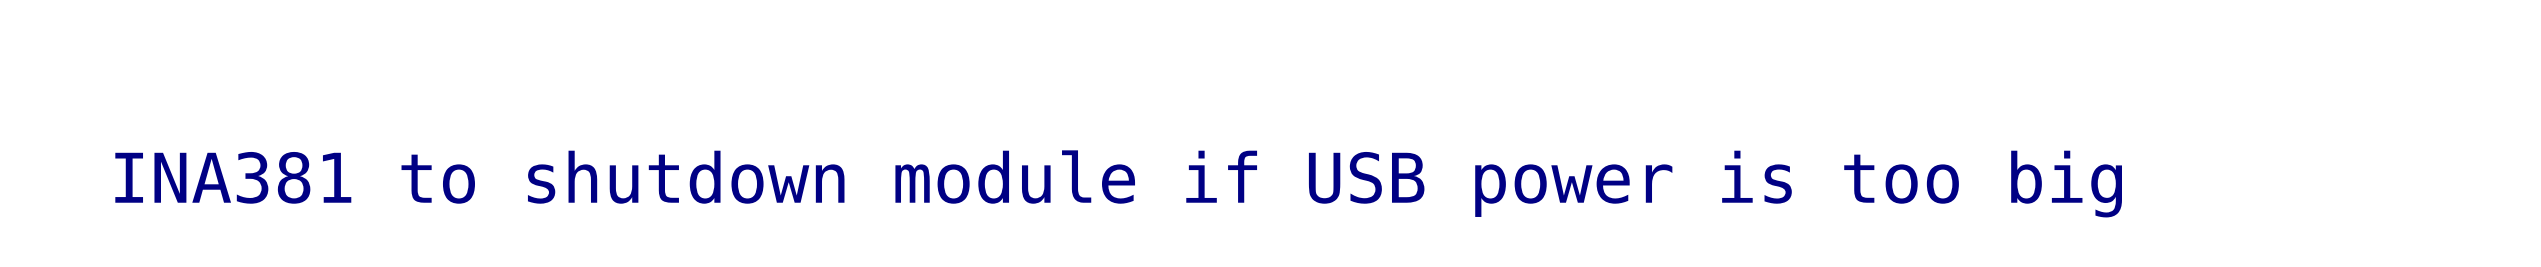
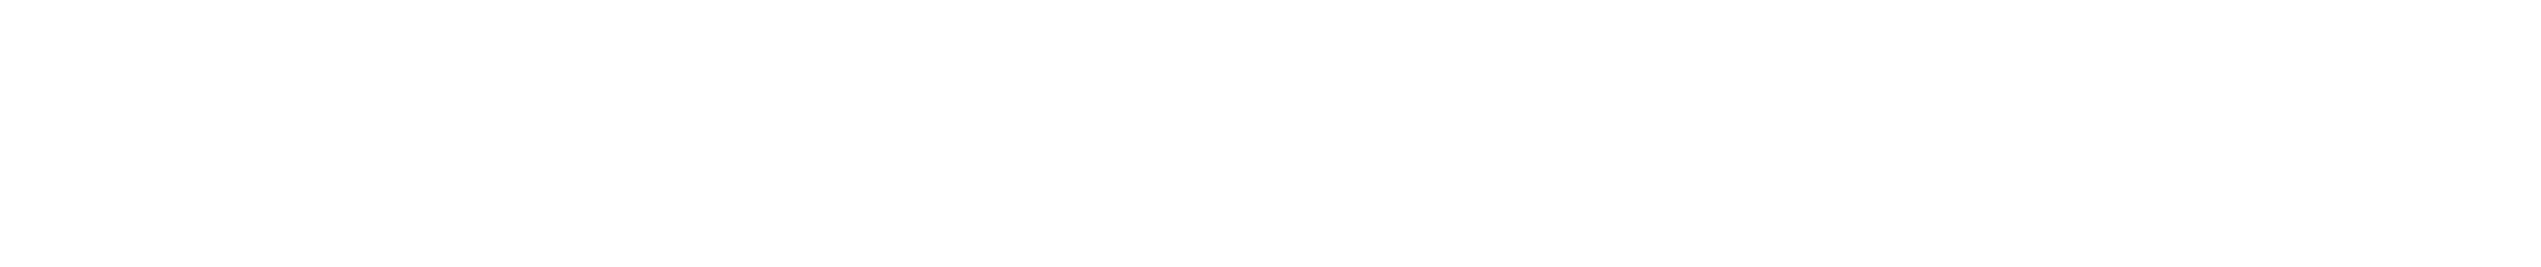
text: INA381 to shutdown module if USB power is too big (1118, 183) -> none

